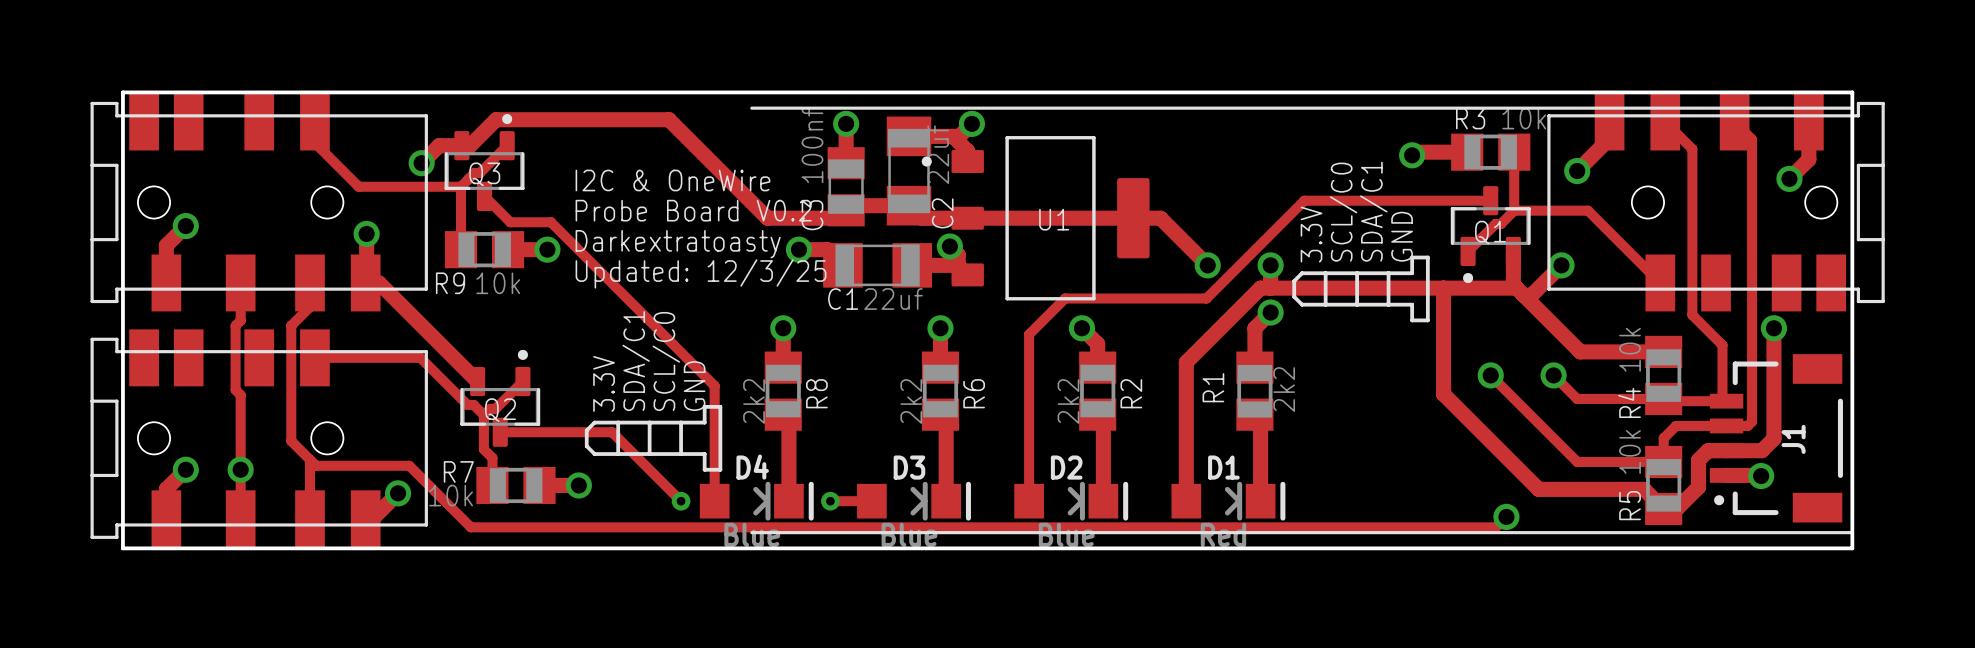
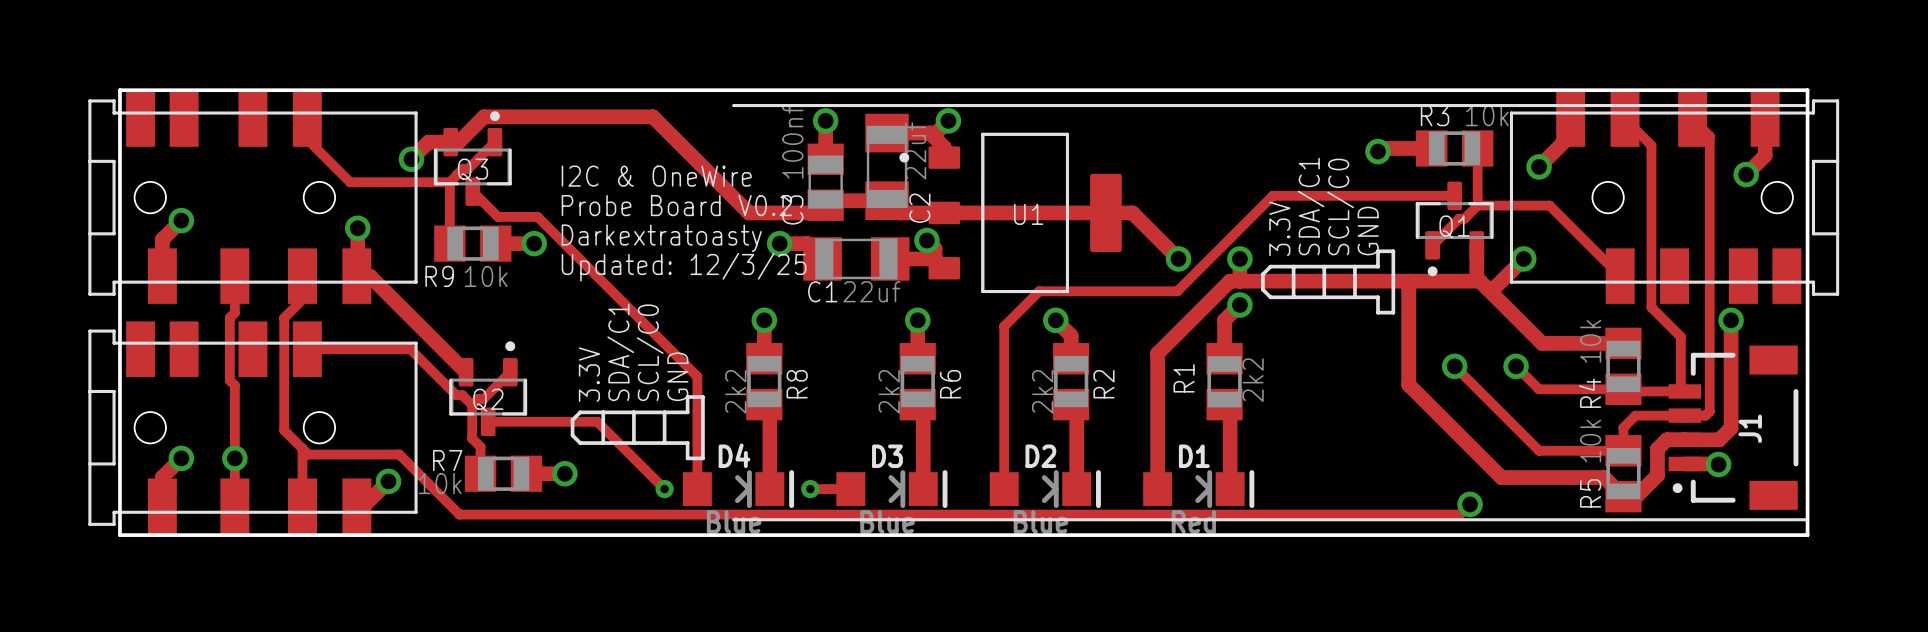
text: SDA/C1 (1373, 211) -> SCL/C0 (1340, 207)
text: SCL/C0 (1343, 212) -> SDA/C1 (1311, 206)

